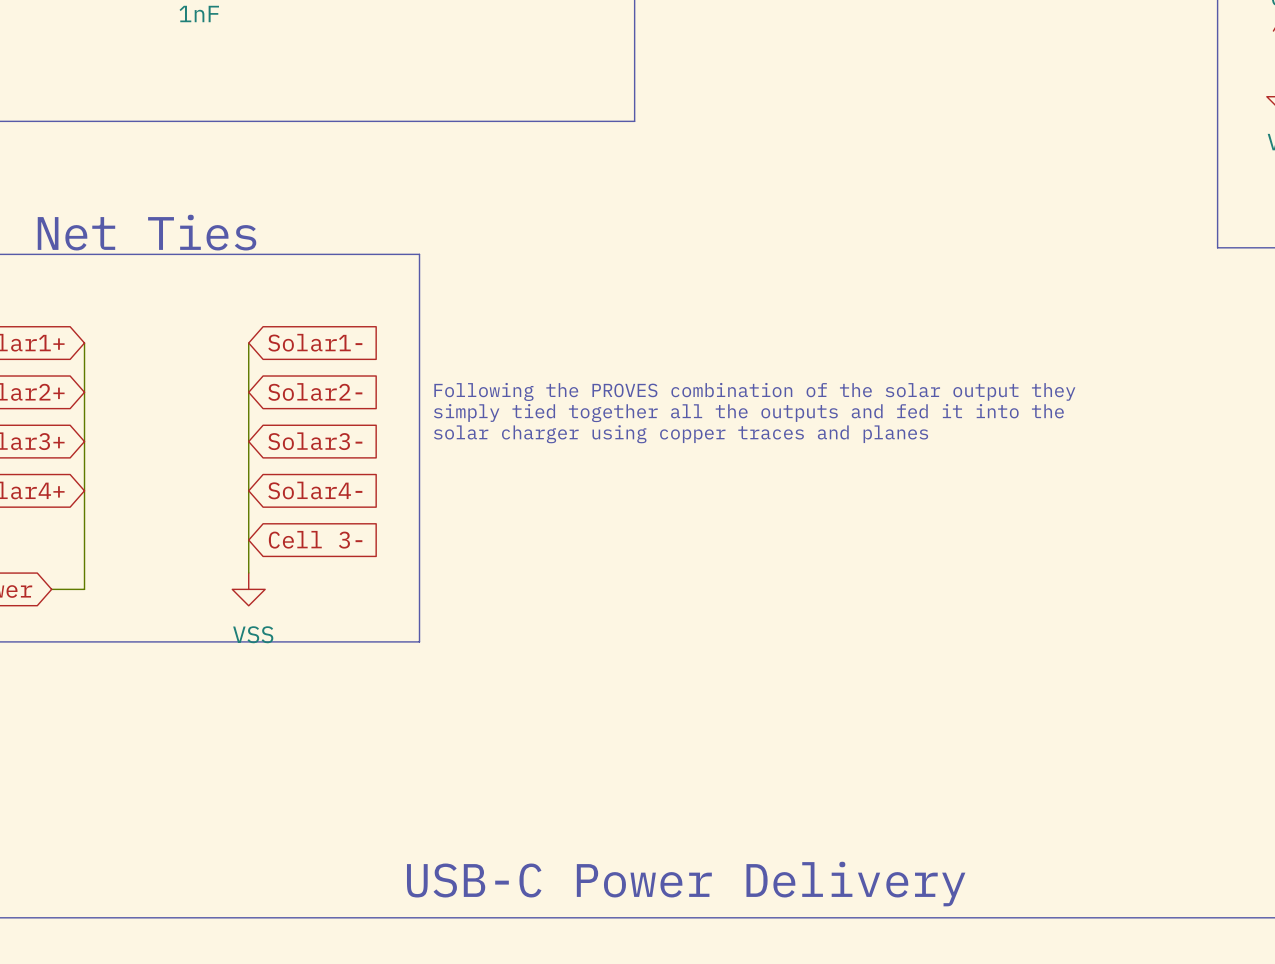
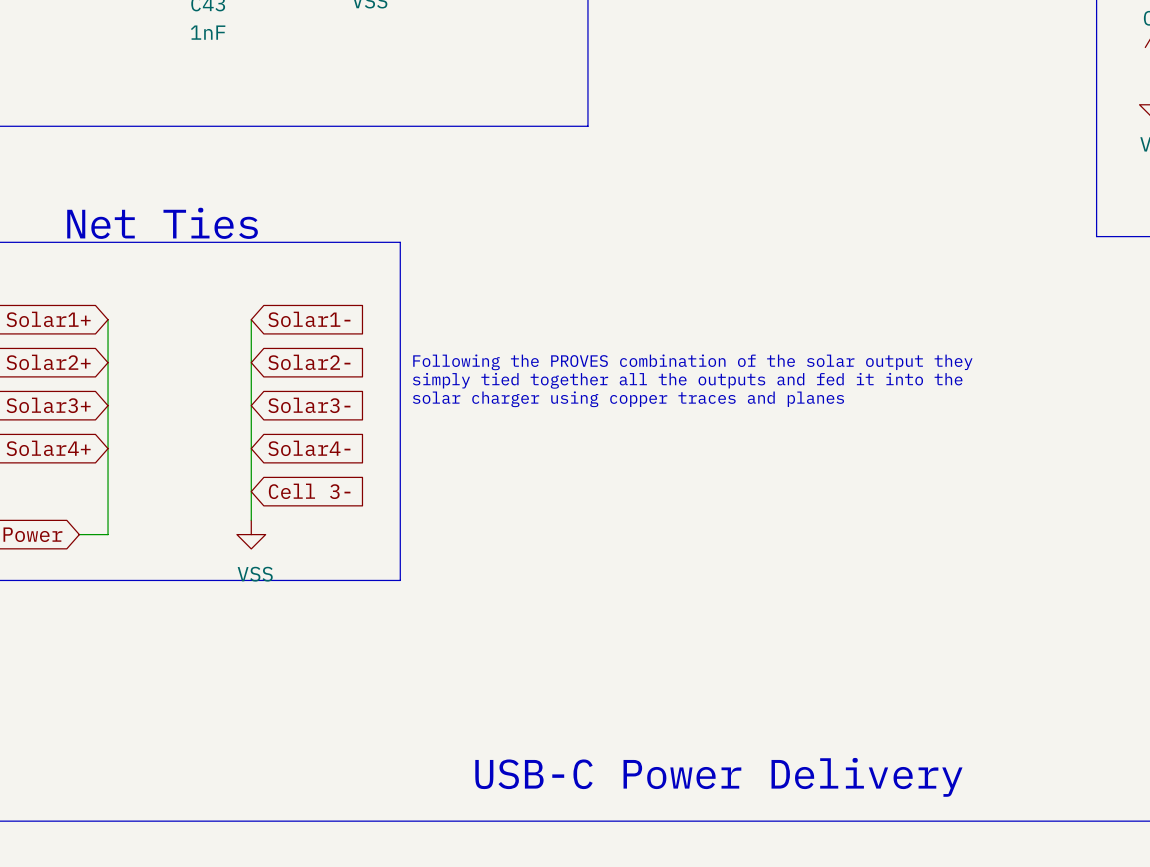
text position: USB-C Power Delivery (686, 884) -> USB-C Power Delivery (718, 777)

